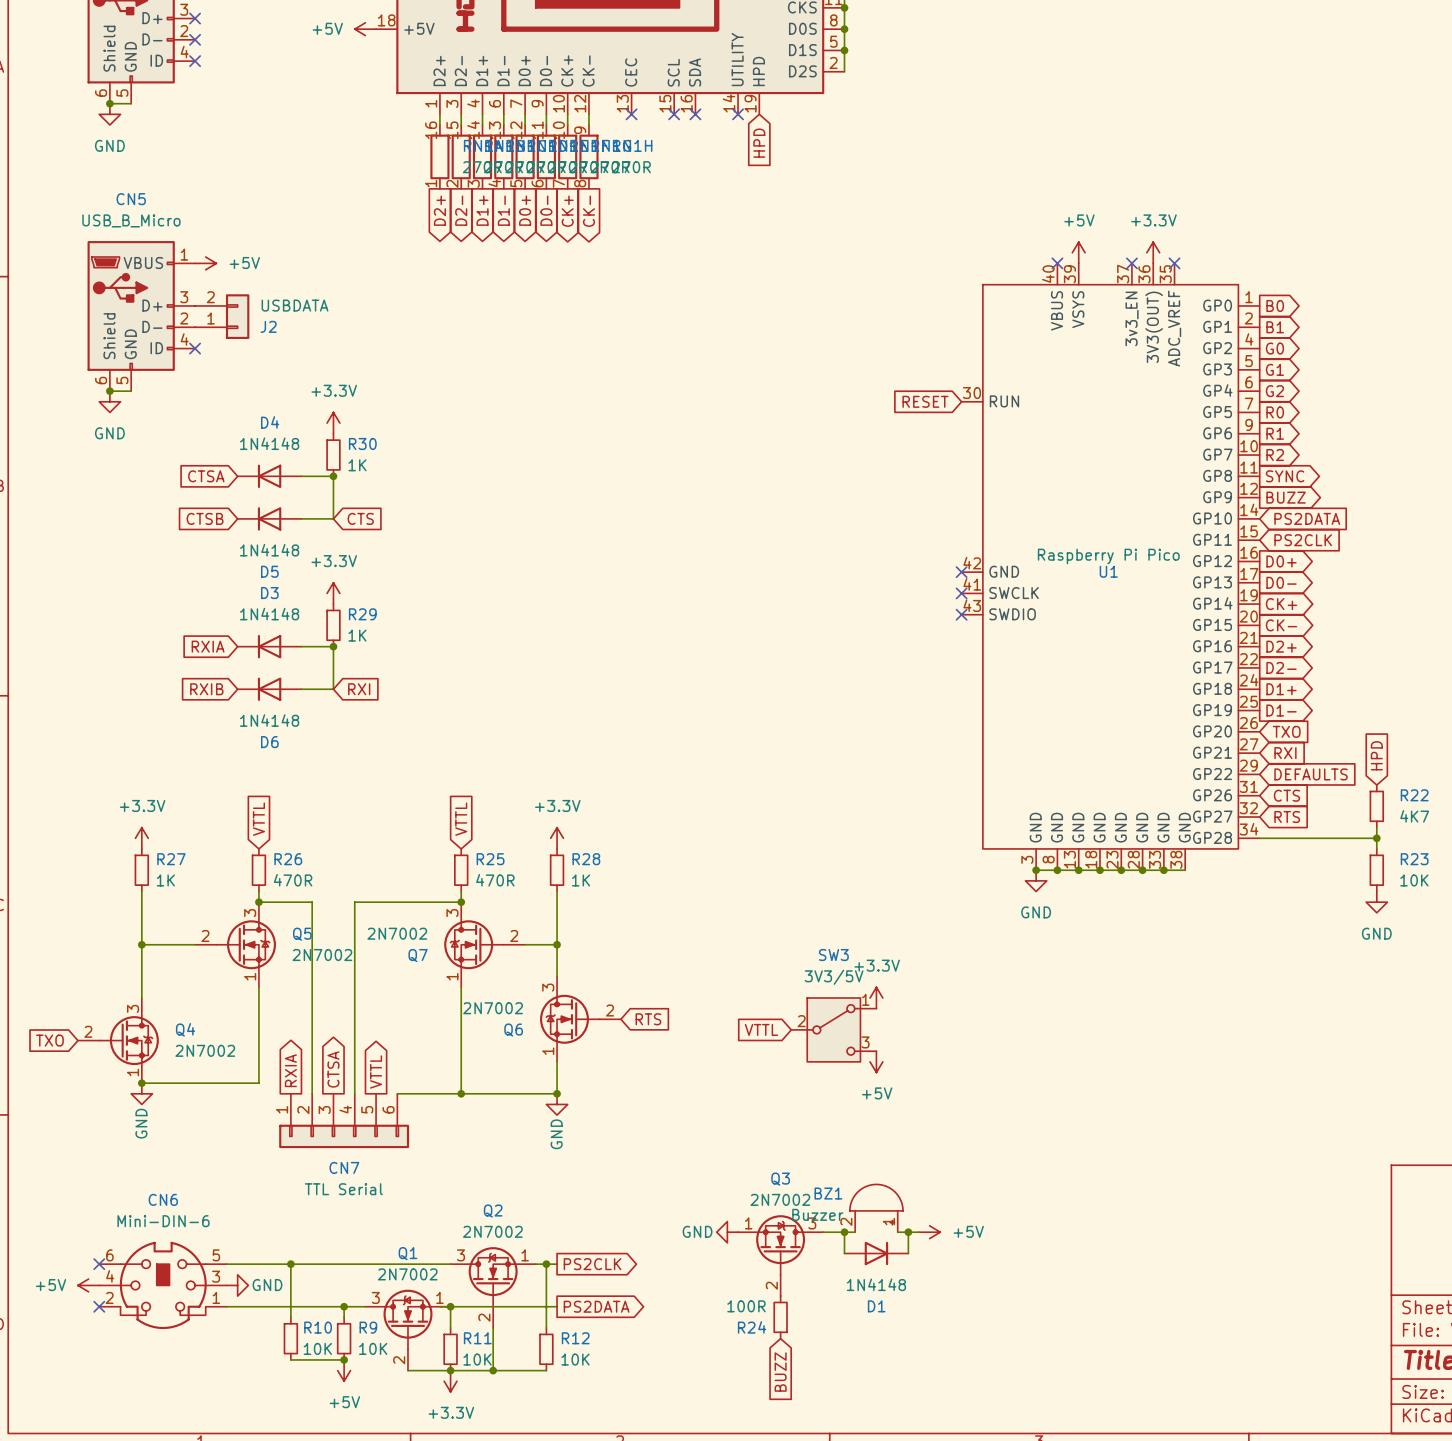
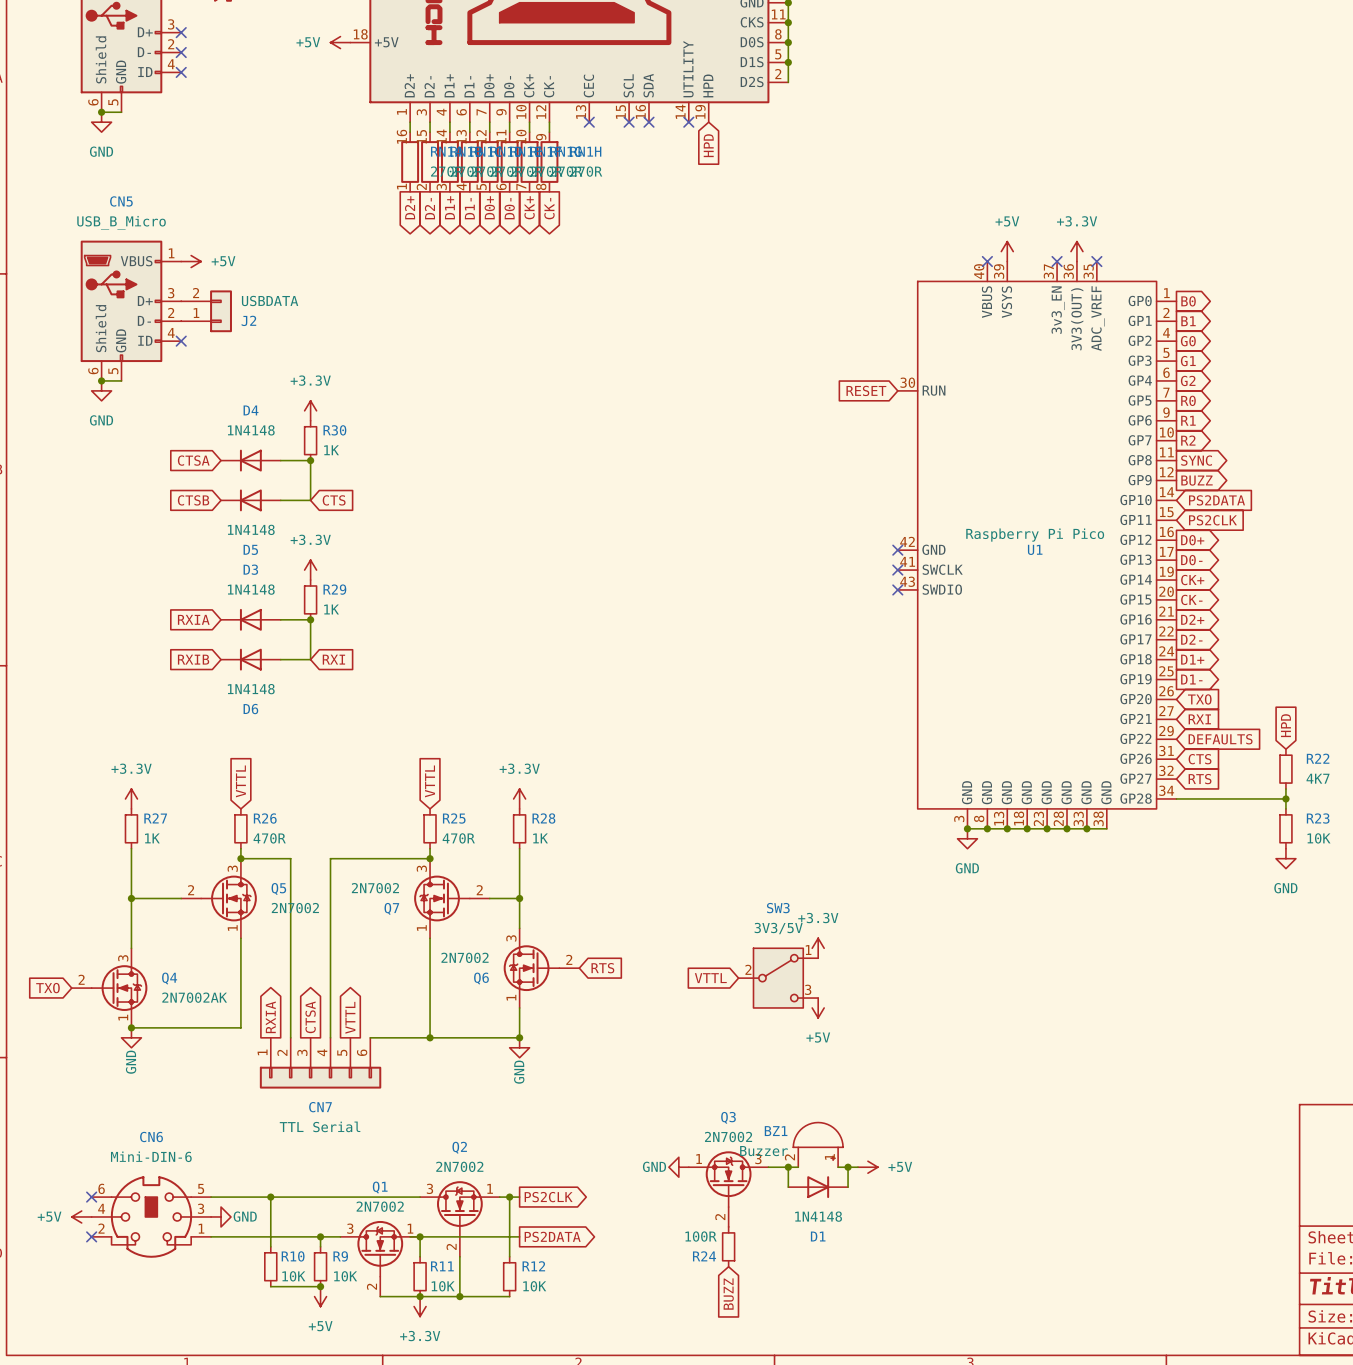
Q4 value: 2N7002 (205, 1050) -> 2N7002AK (194, 997)

